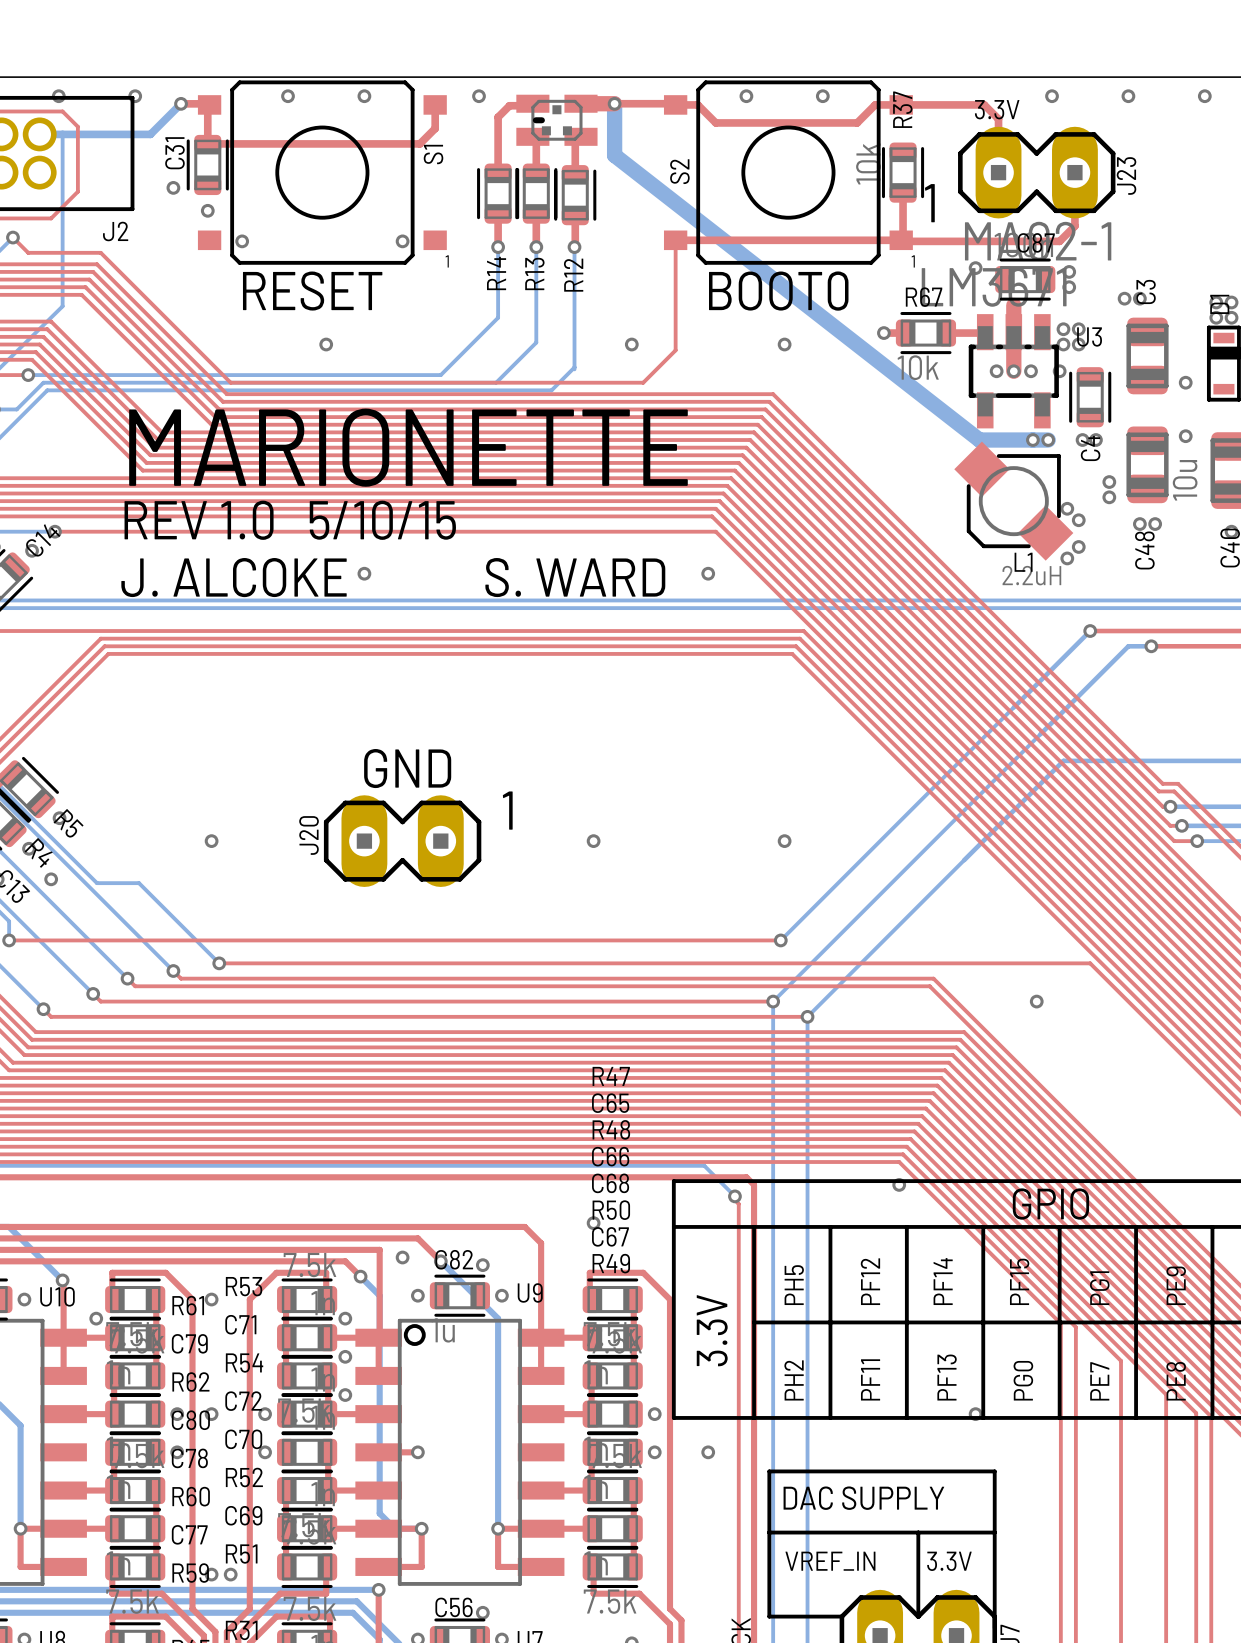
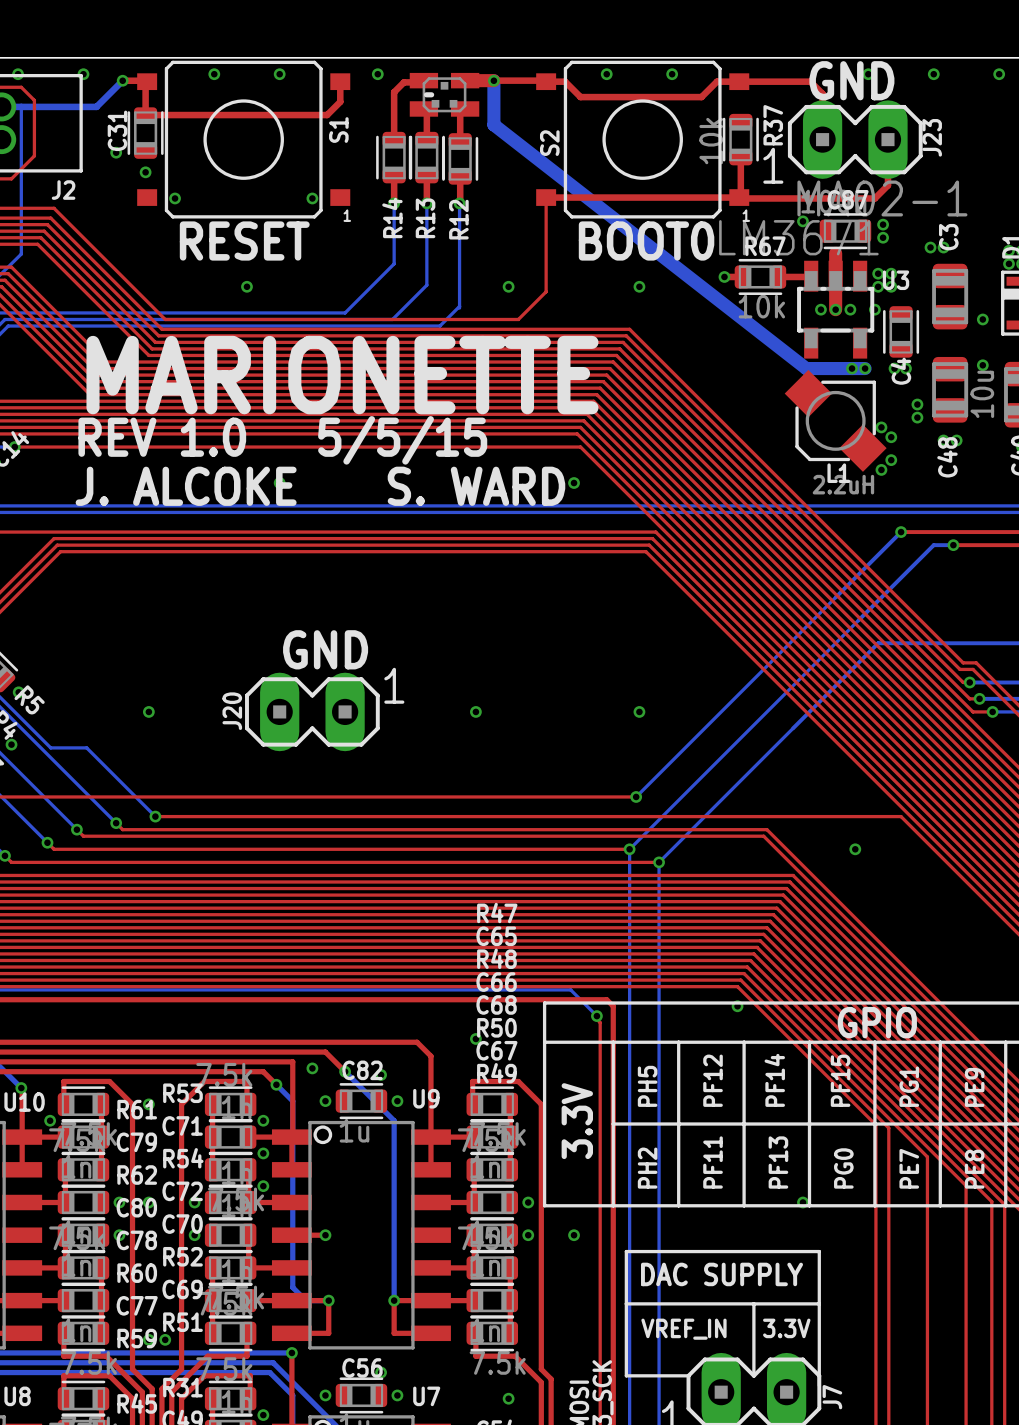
text: none -> GND (851, 80)
R37 name position: R37 (902, 109) -> R37 (773, 125)
text: 3.3V (997, 109) -> none
text: REV 1.0 5/10/15 (290, 520) -> REV 1.0 5/5/15 (282, 440)

